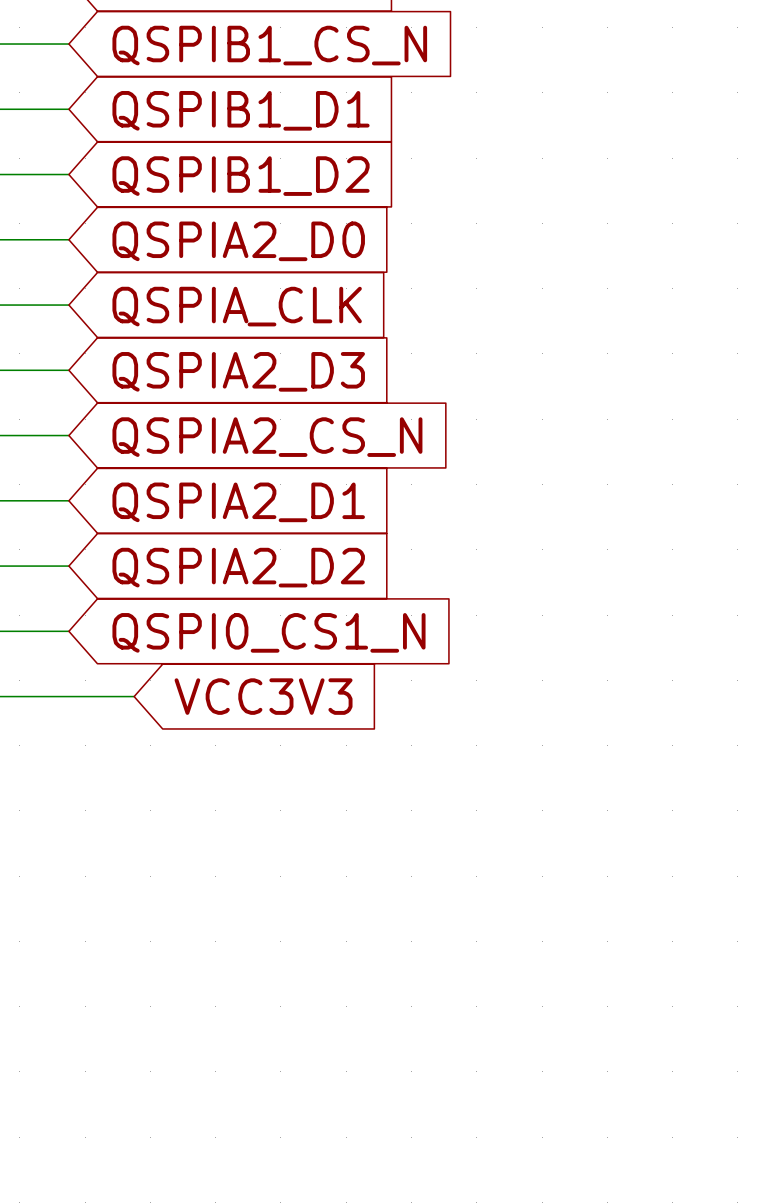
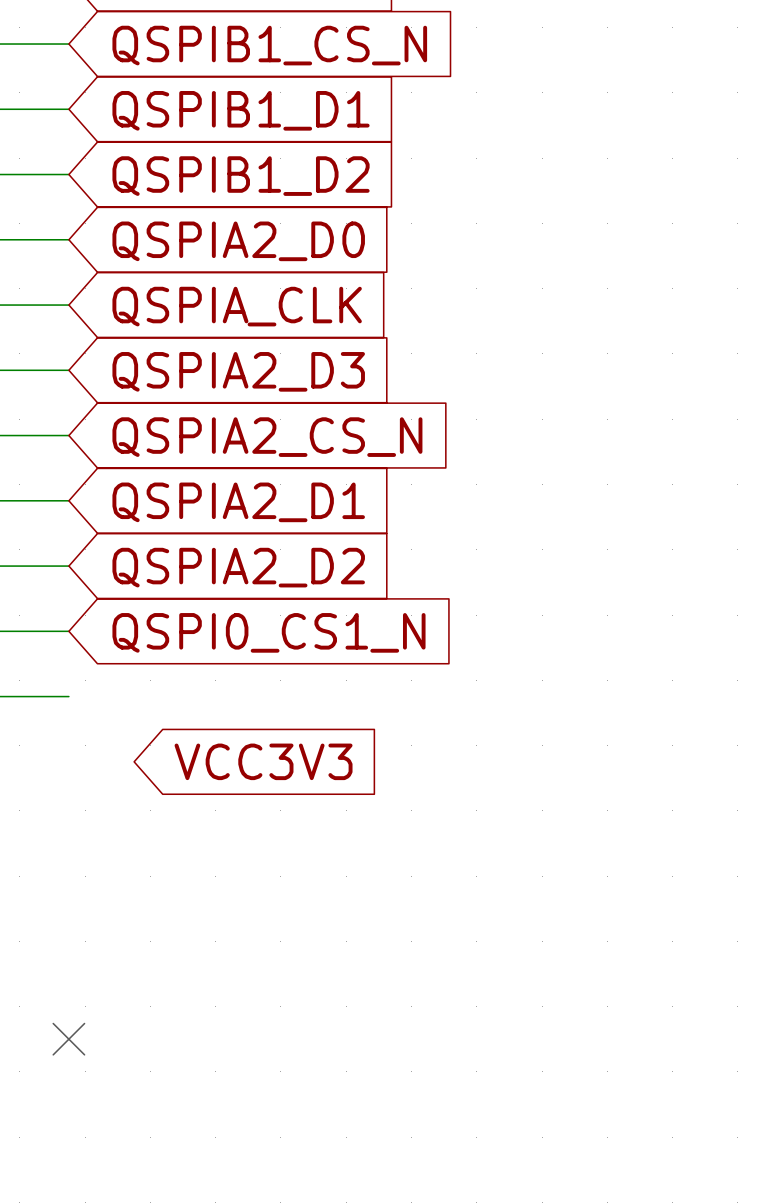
wire: (68, 696) (134, 696) -> none
global label position: VCC3V3 (263, 696) -> VCC3V3 (263, 761)
no-connect mark: none -> (68, 1039)

